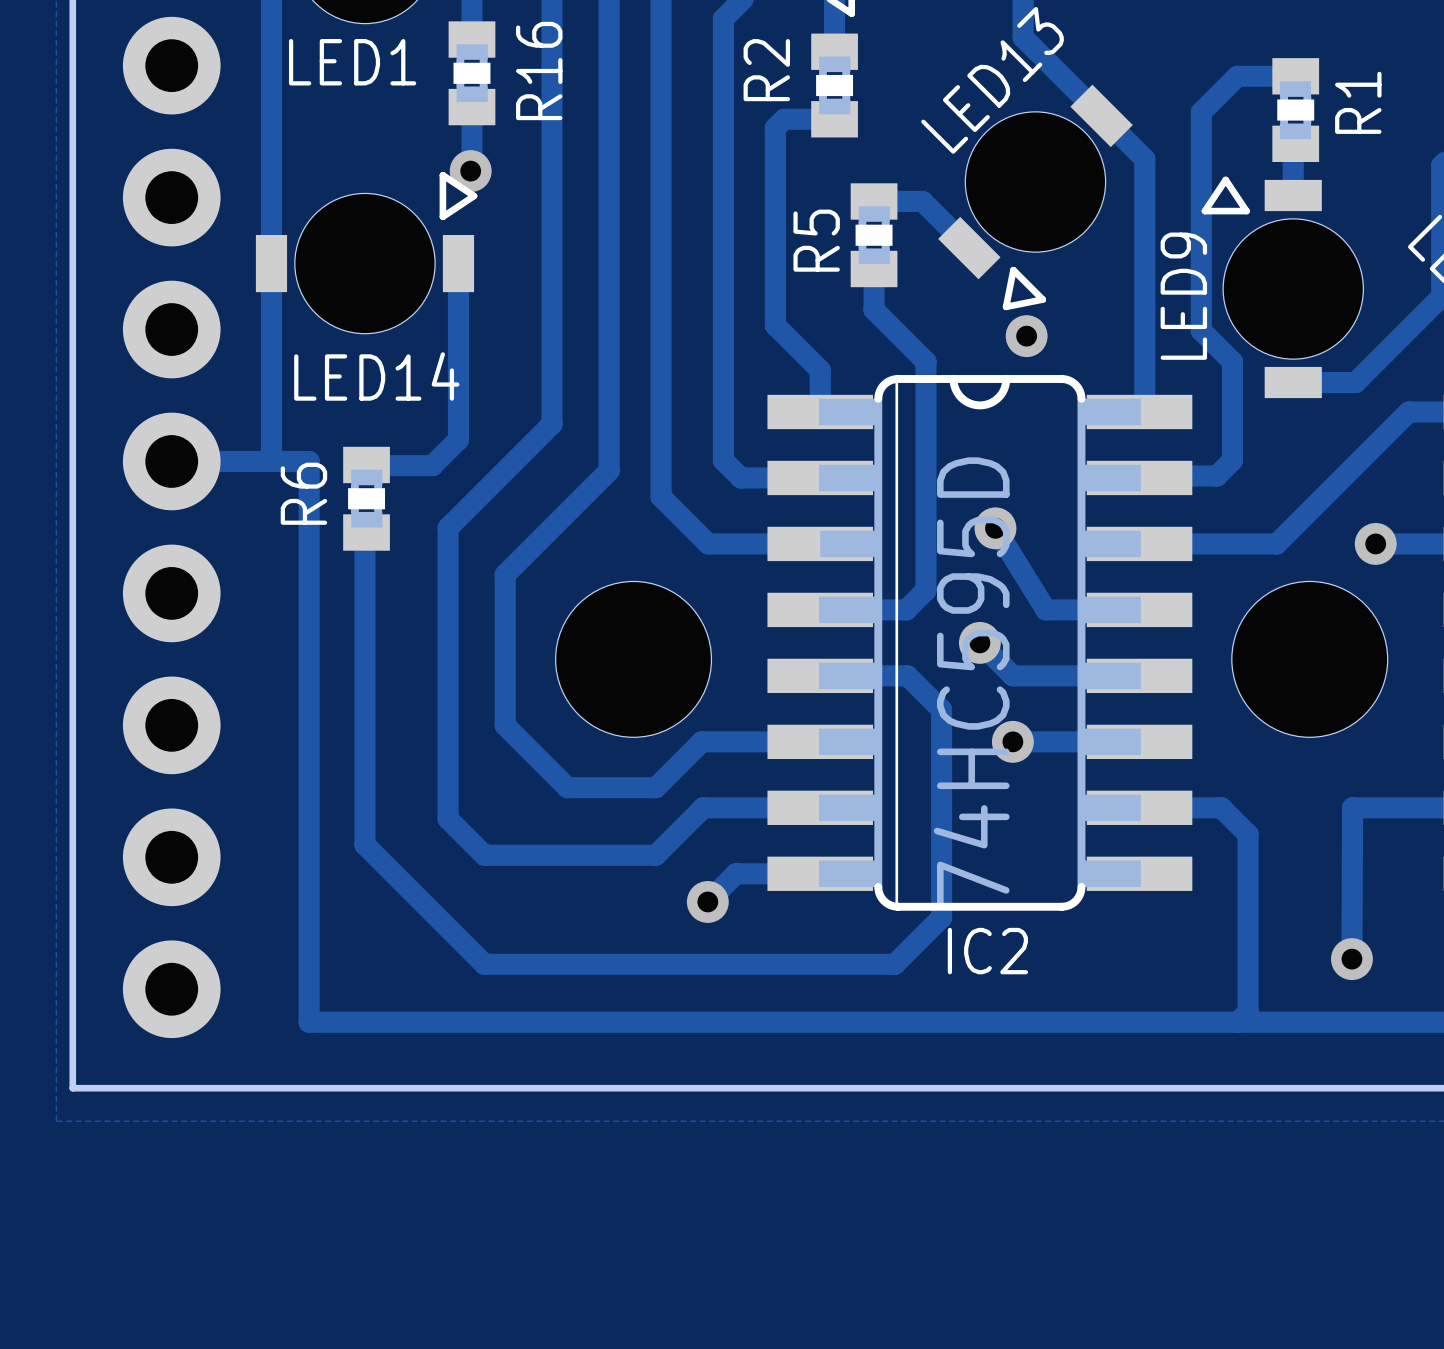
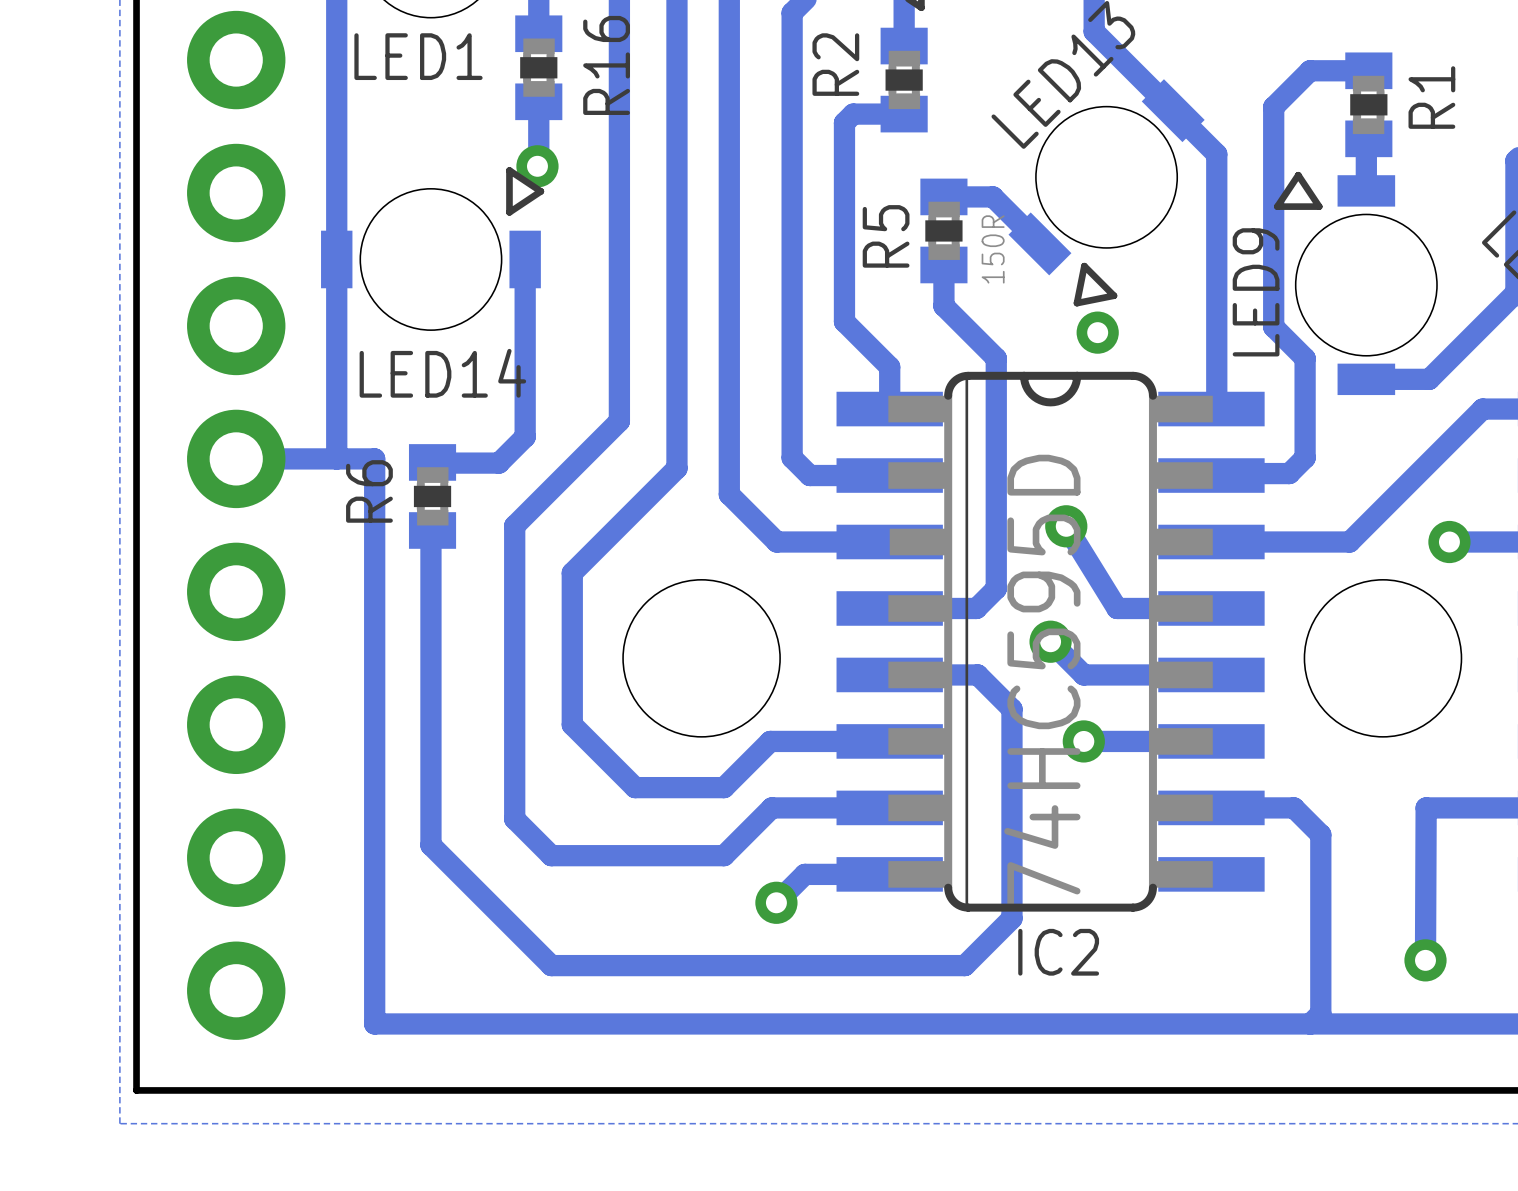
R5 value: none -> 150R (993, 249)

